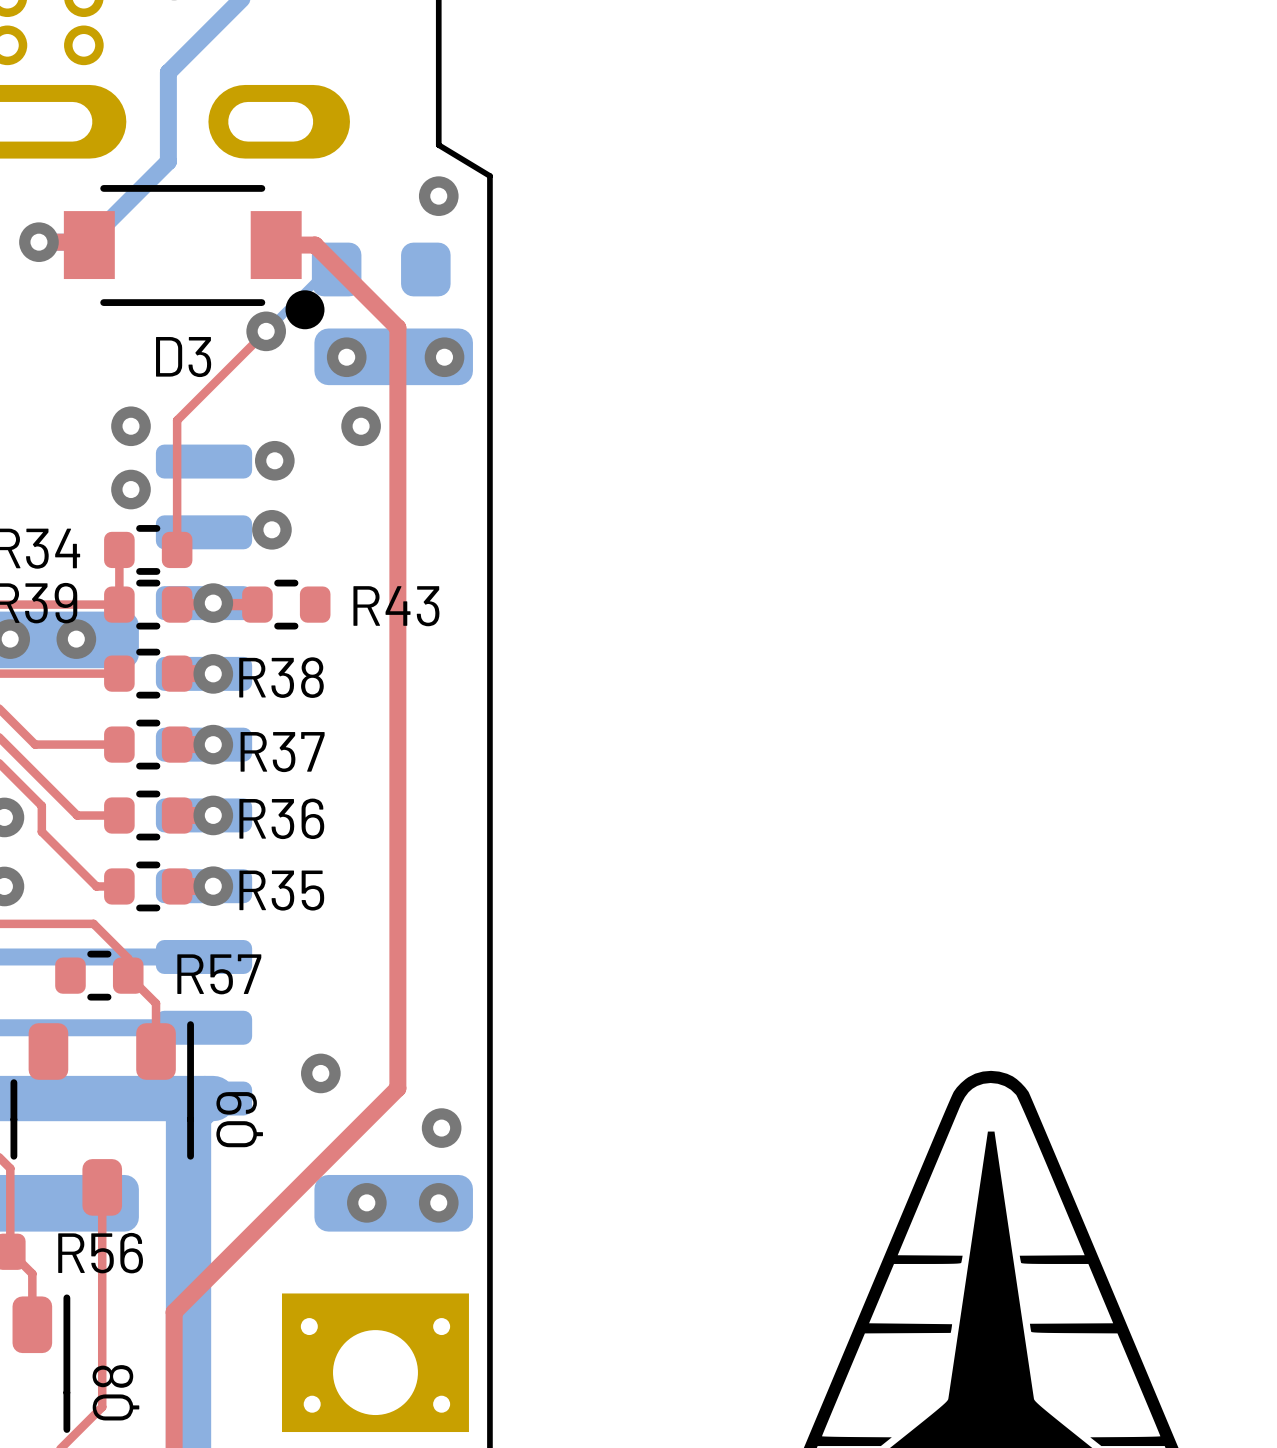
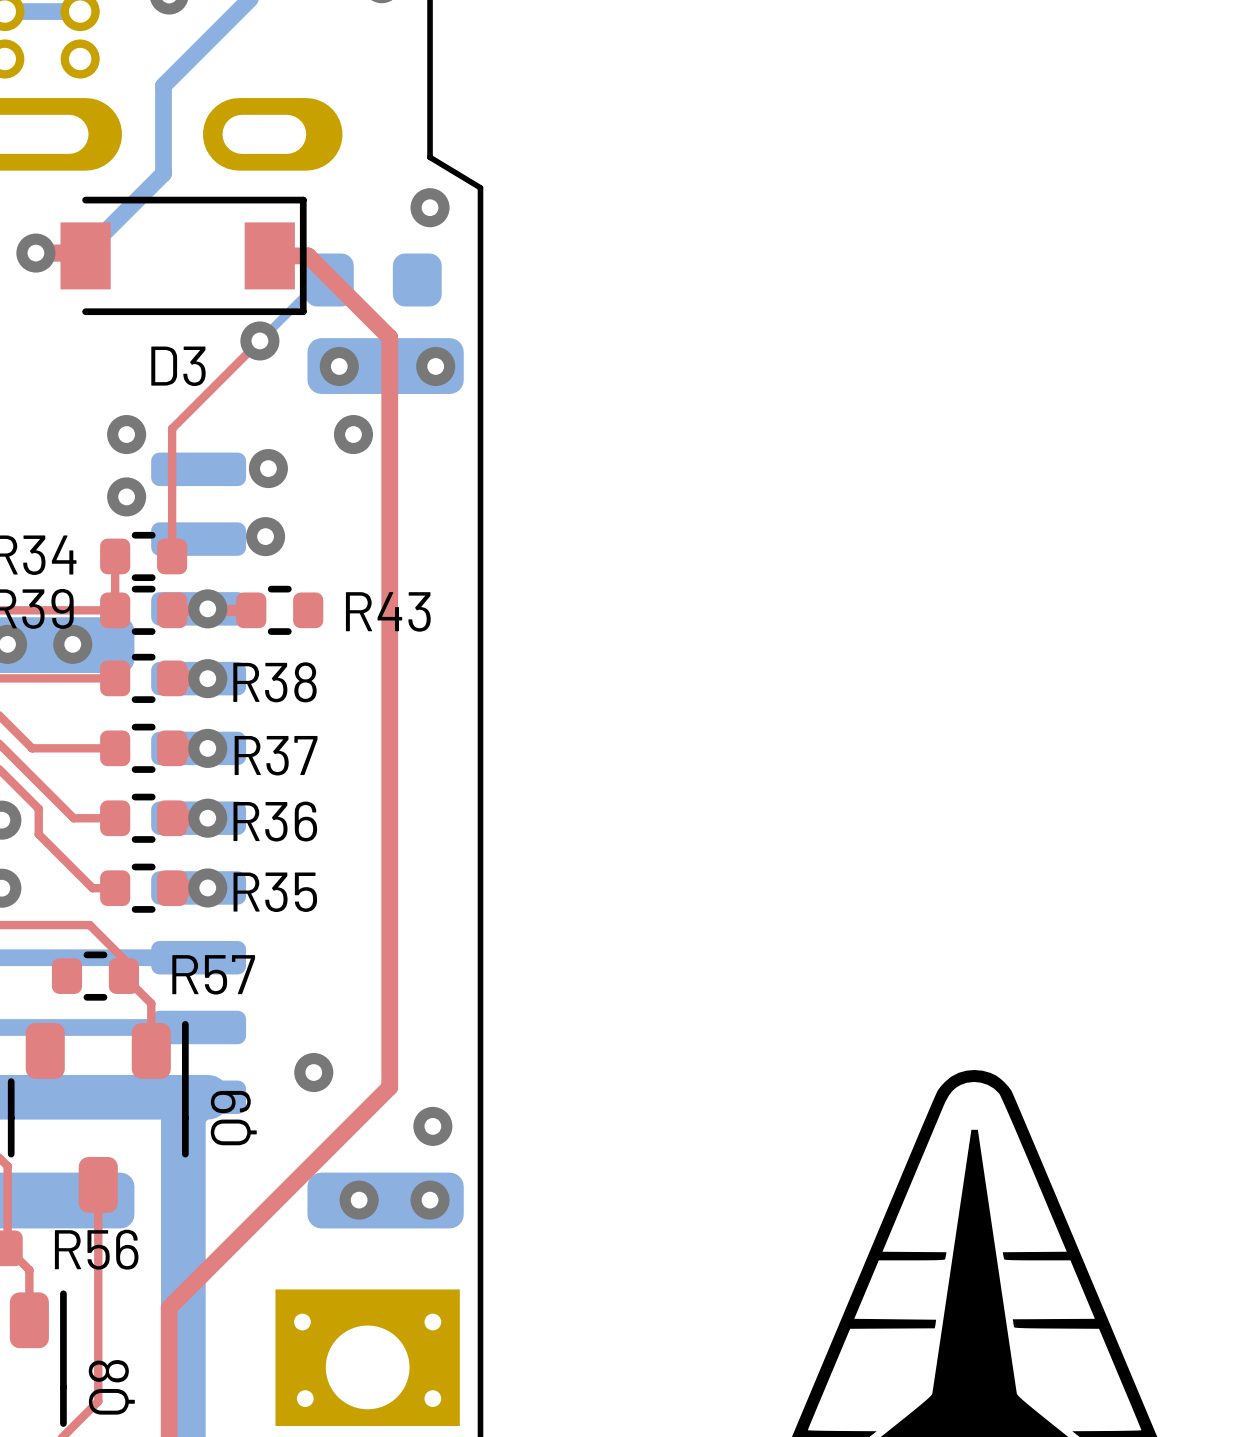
D3 footprint: [63, 185, 325, 330] -> [60, 196, 307, 316]

